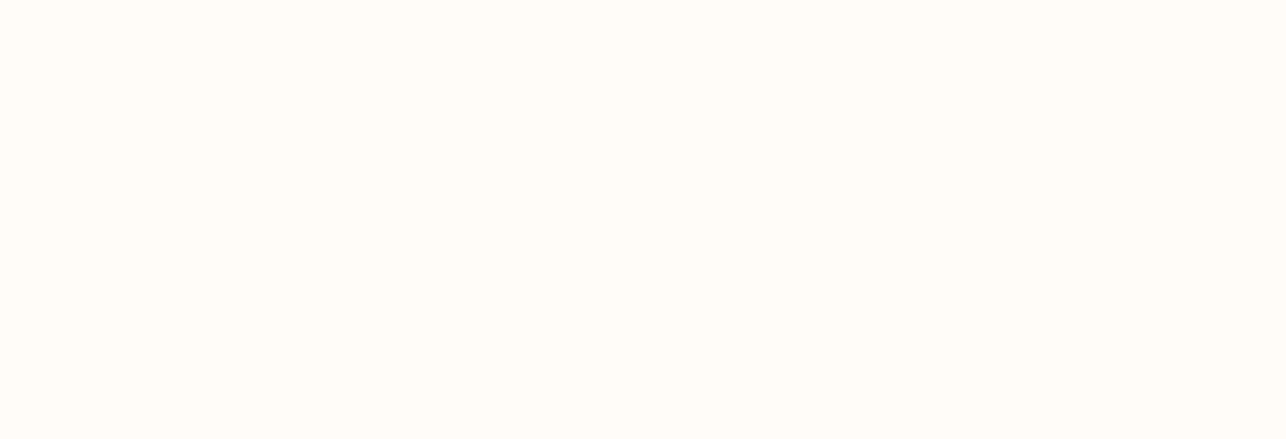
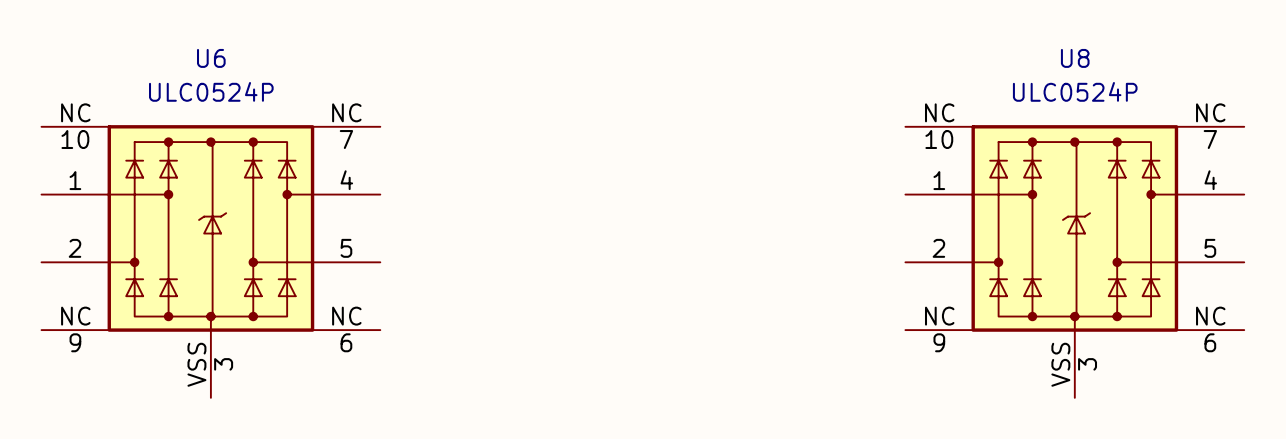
U6: none -> ULC0524P (210, 261)
U8: none -> ULC0524P (1074, 261)

